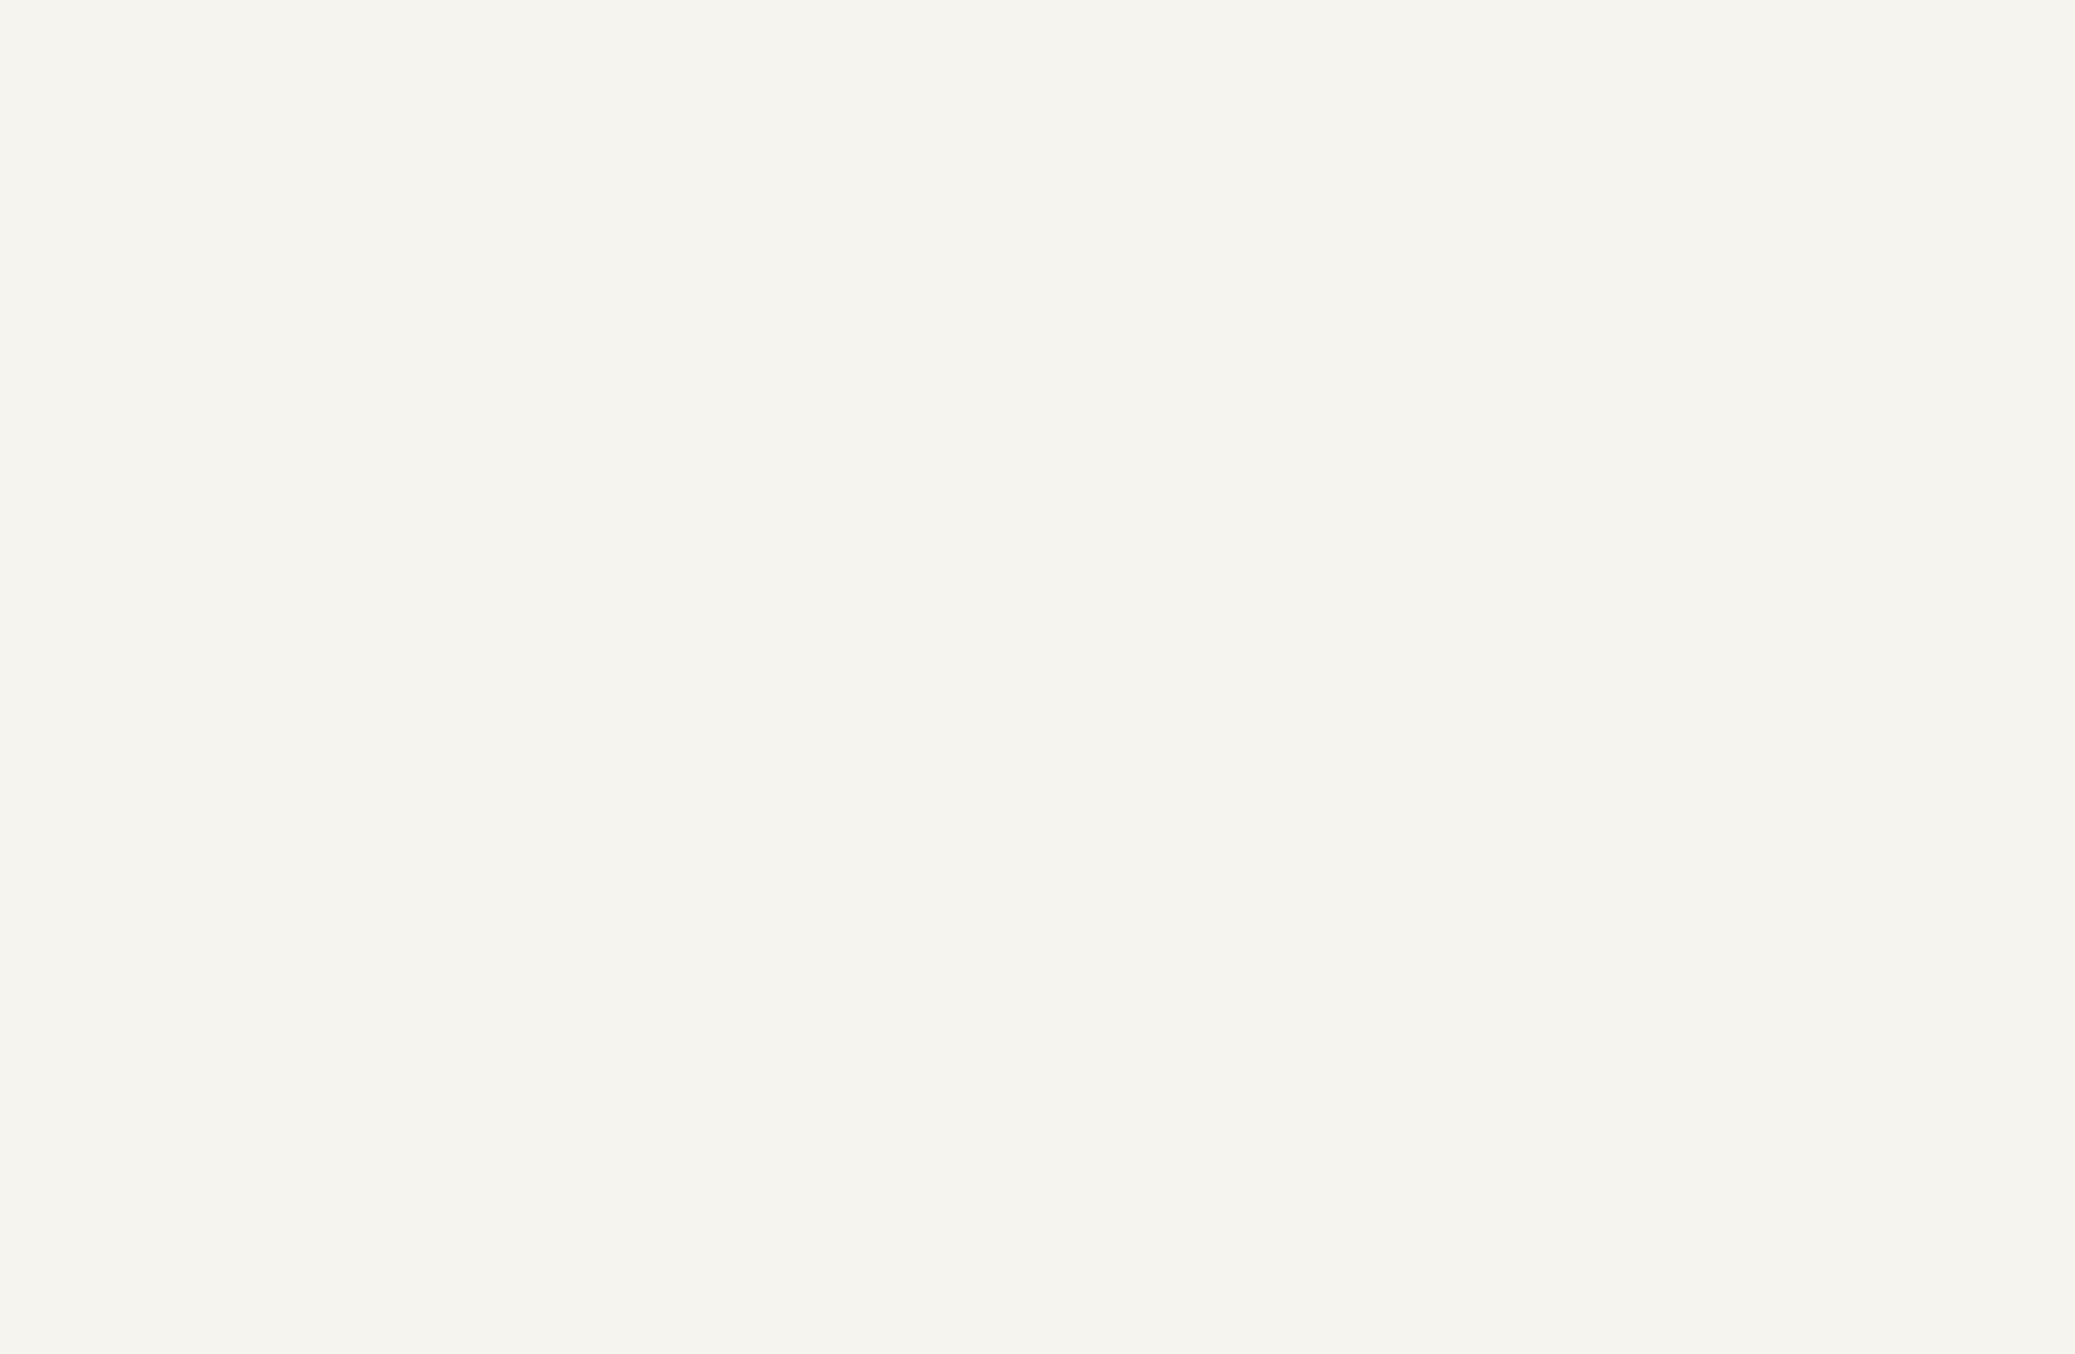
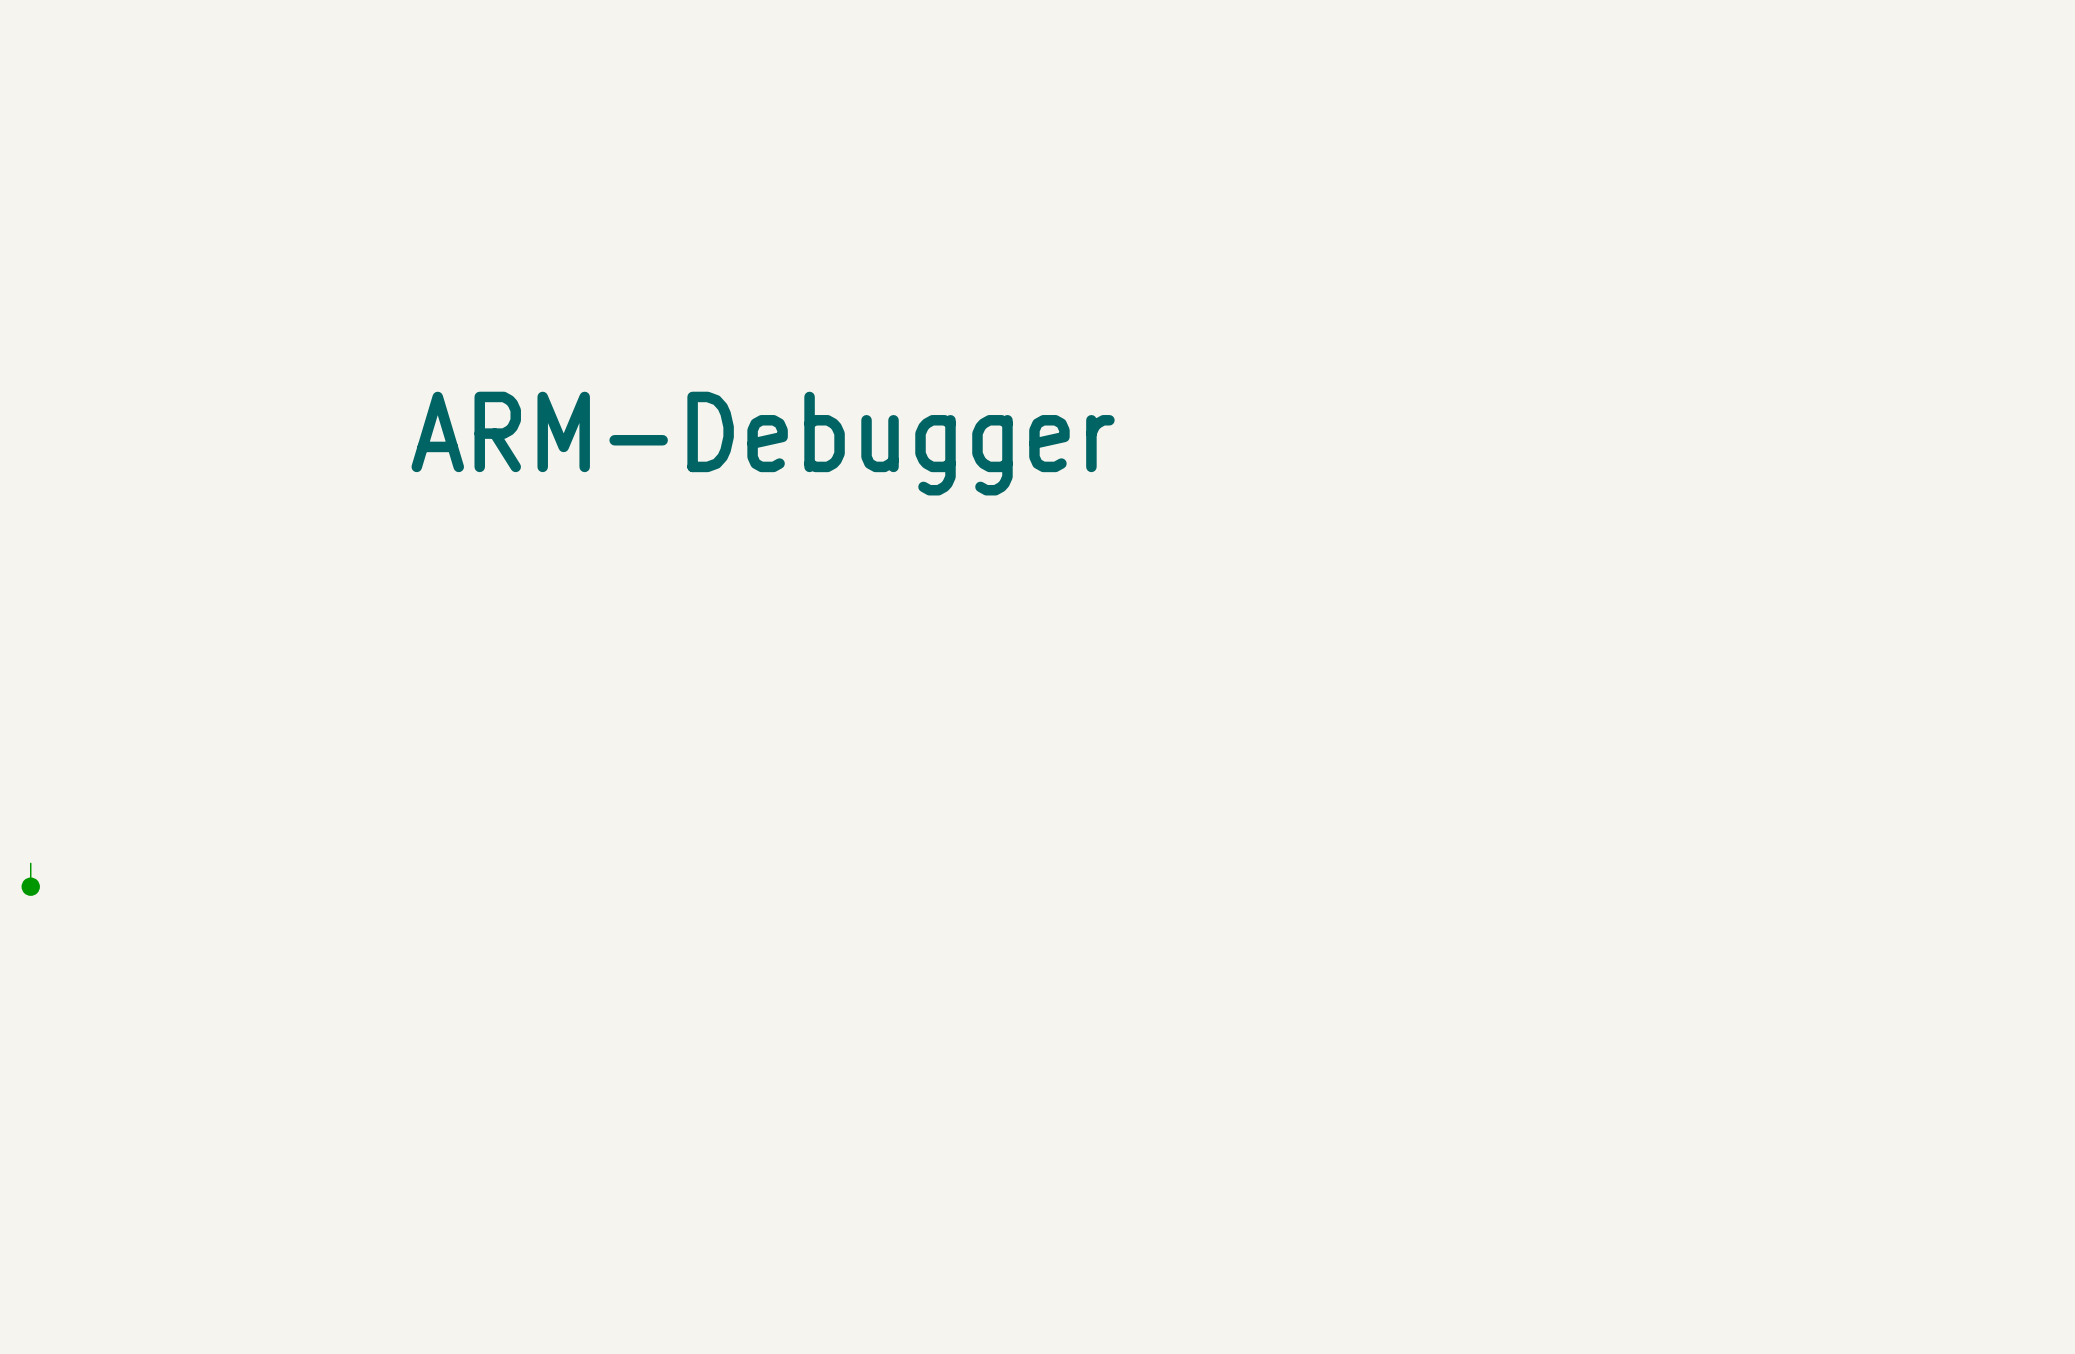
text: none -> ARM-Debugger (763, 443)
wire: none -> (30, 863) (30, 886)
junction: none -> (30, 886)

